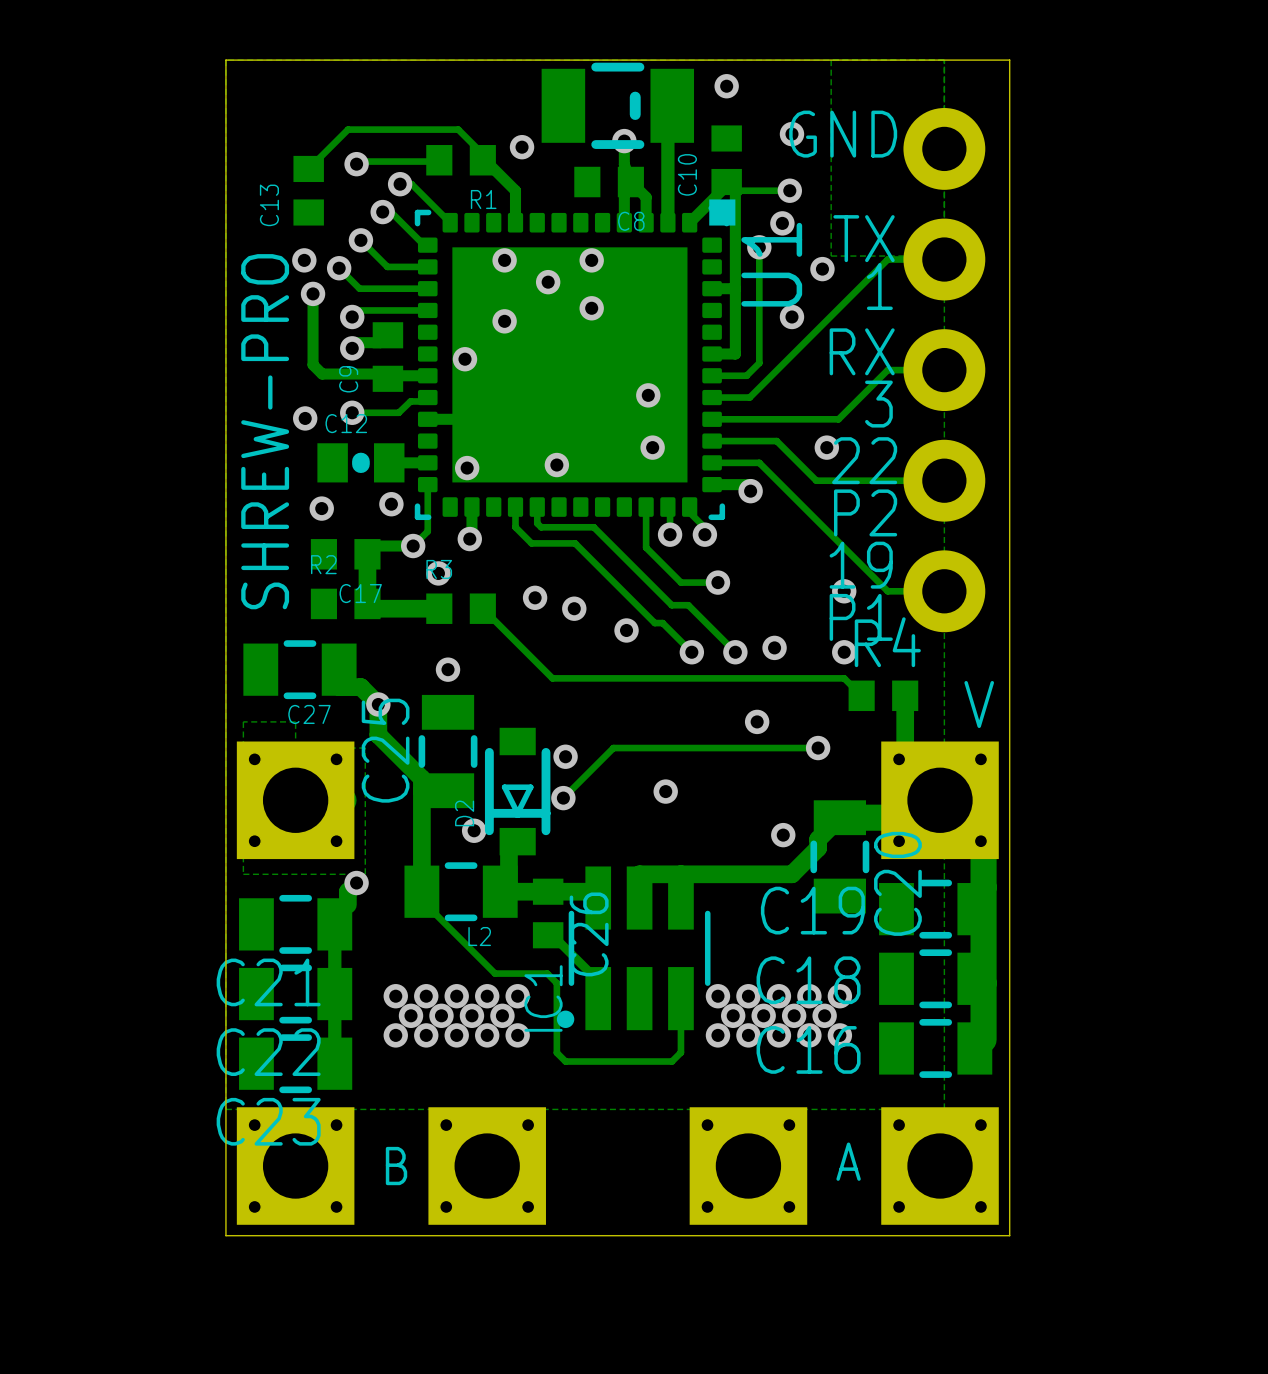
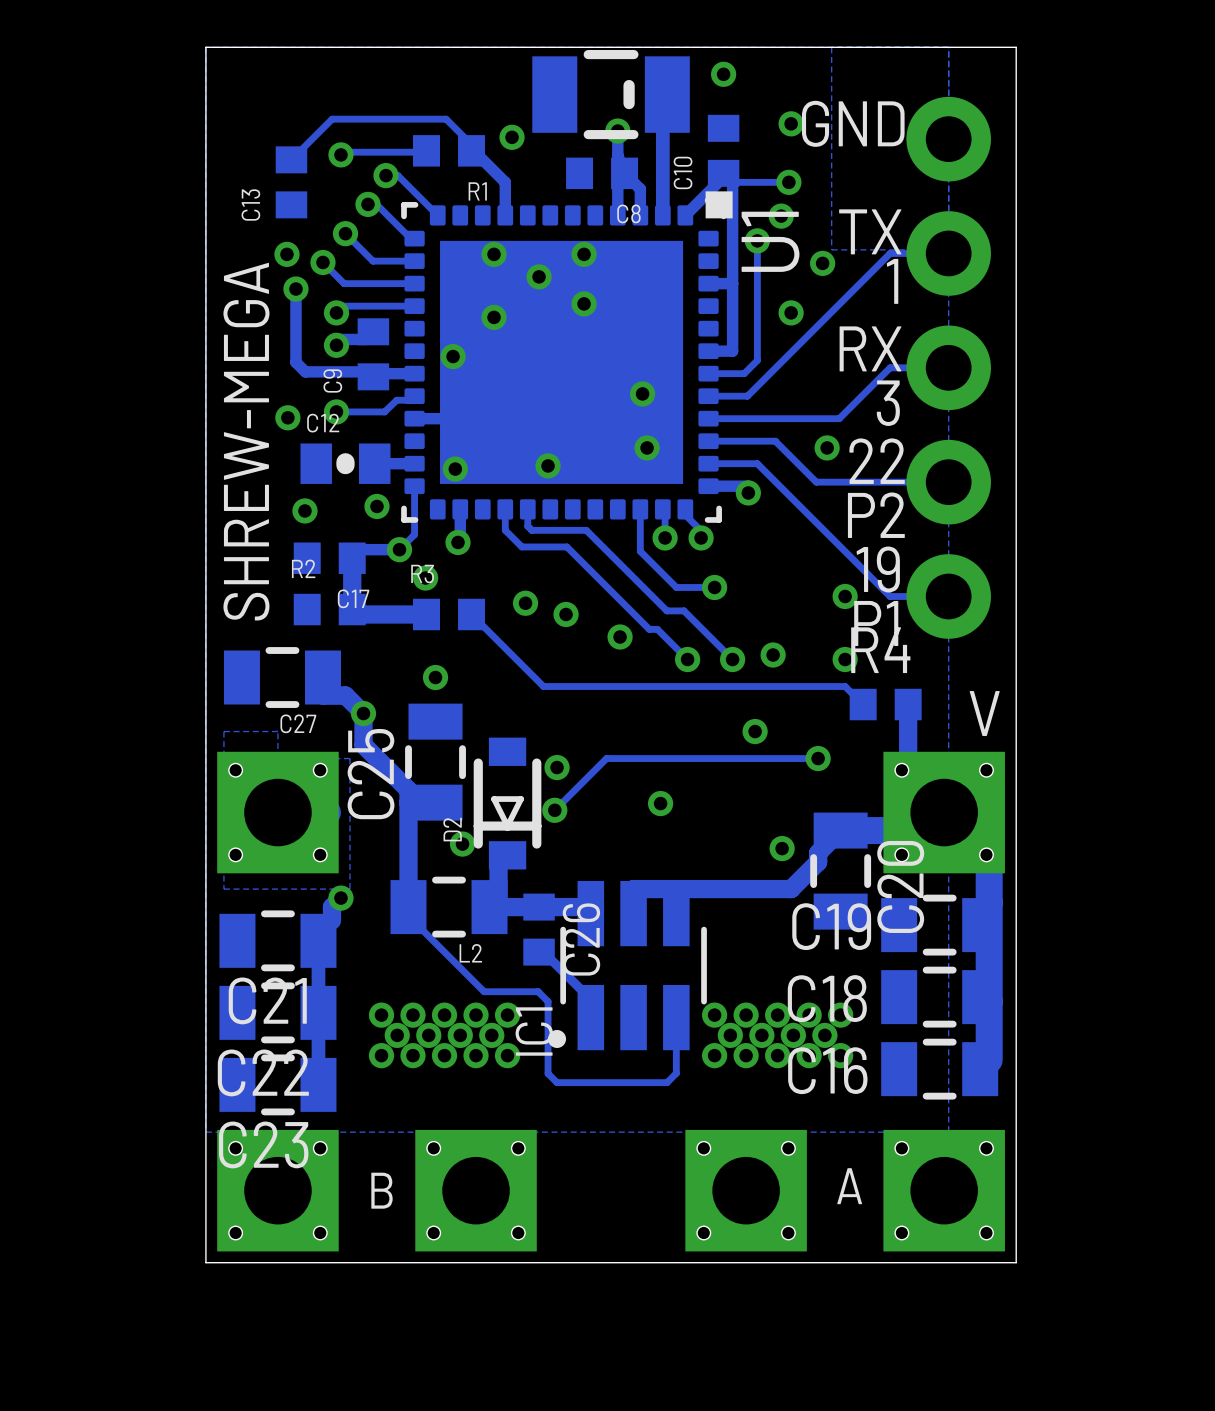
text: SHREW-PRO (265, 431) -> SHREW-MEGA (246, 441)

